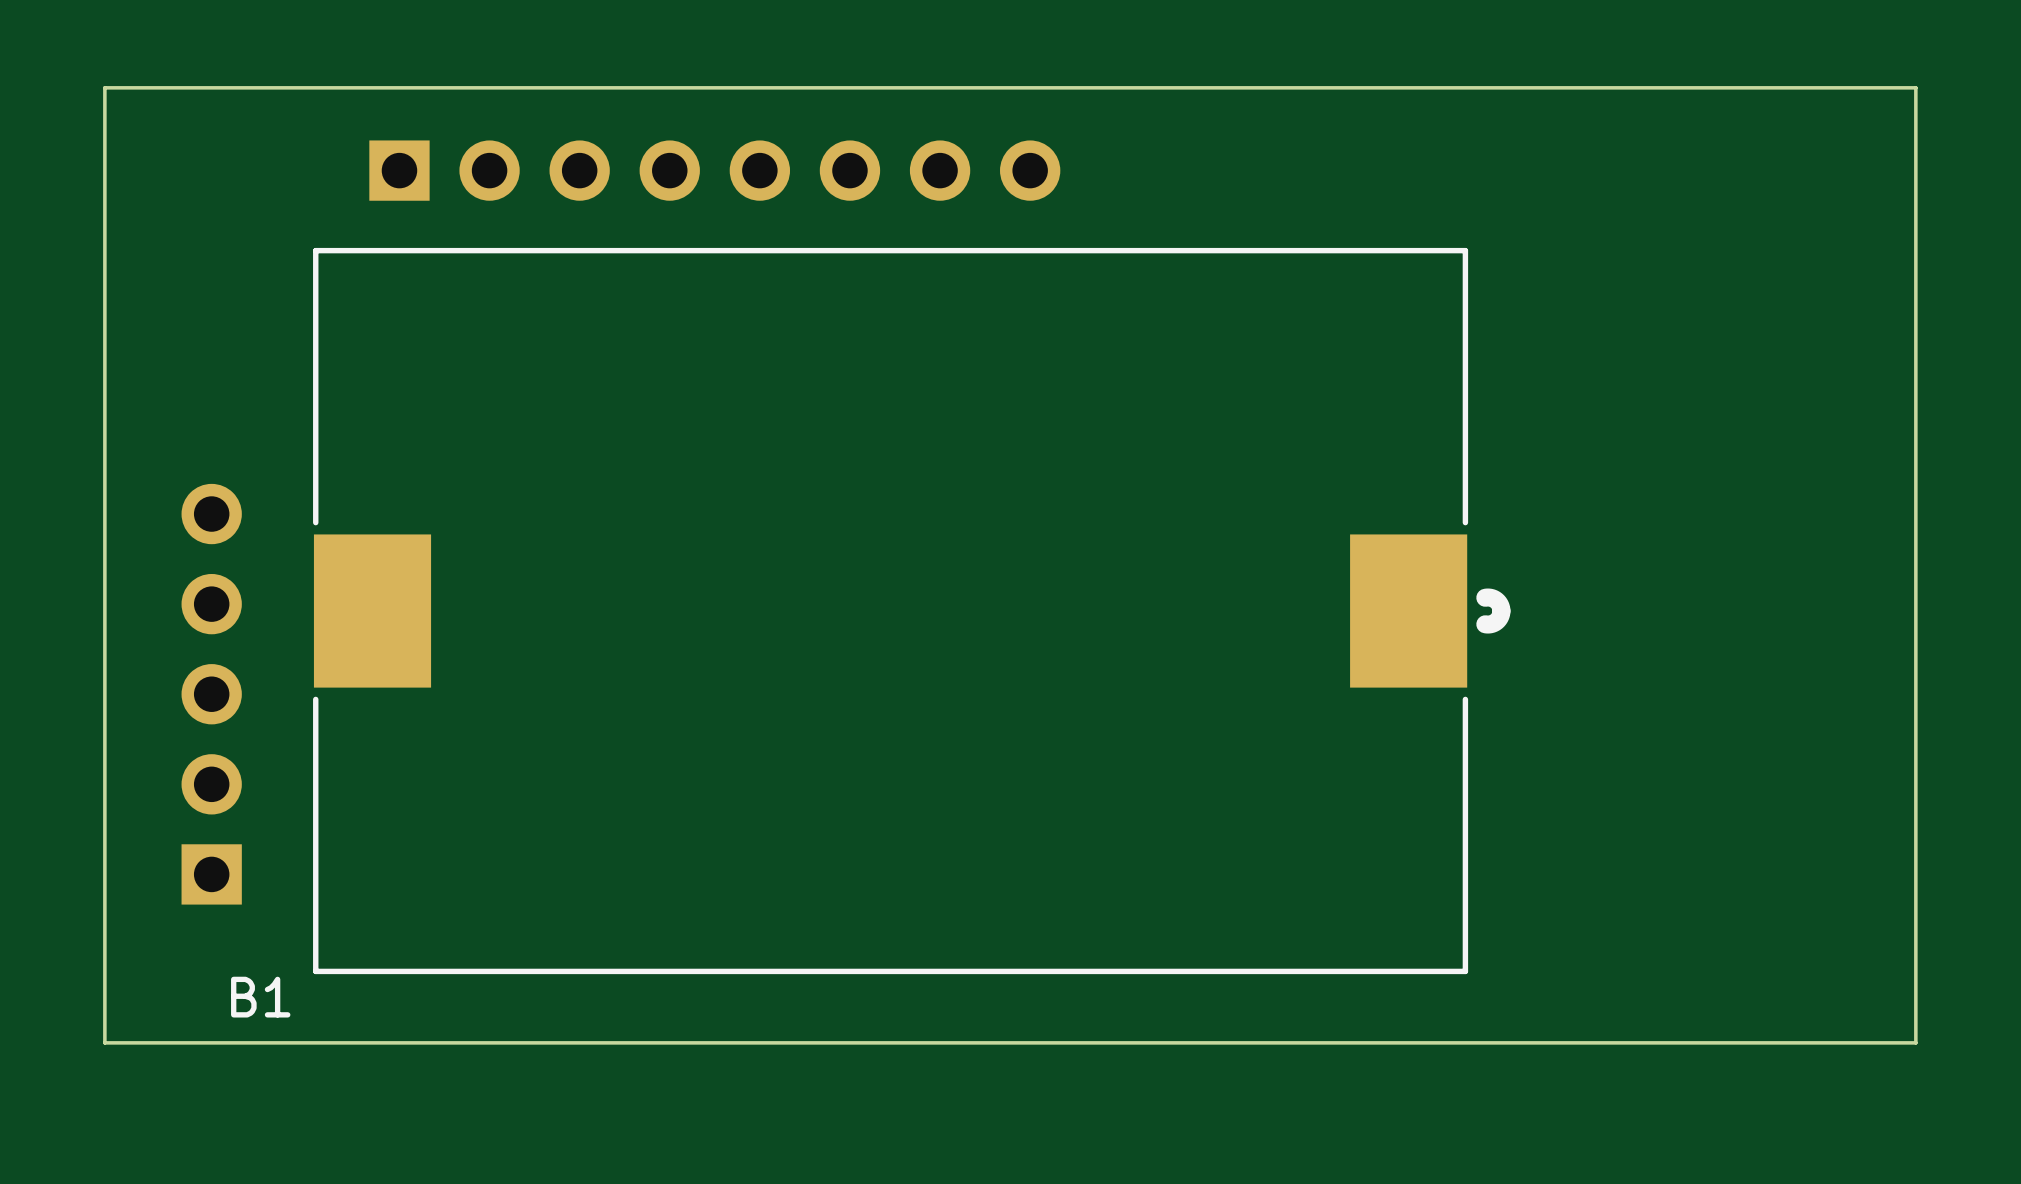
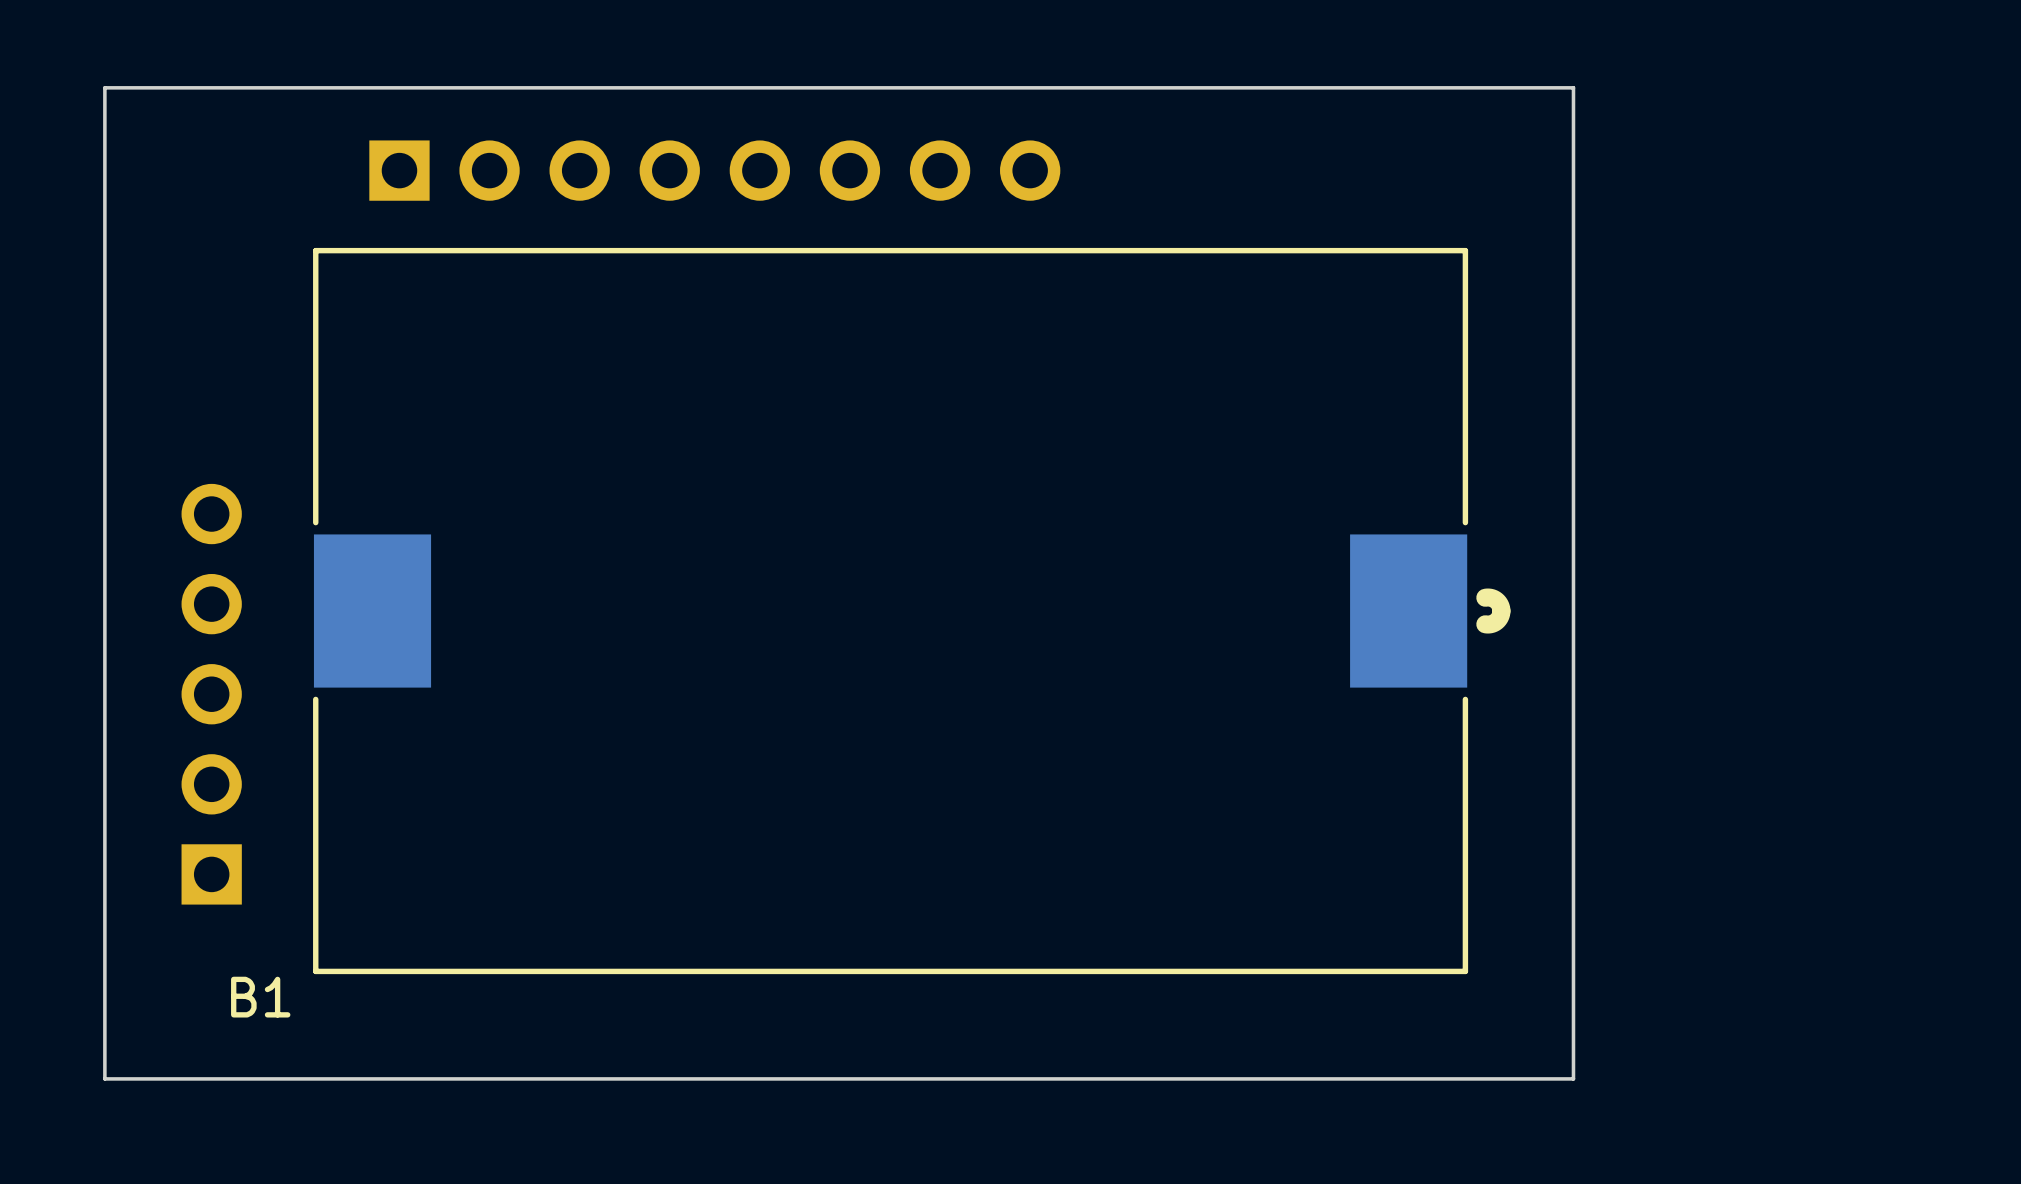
board edge: (1573, 87) (1915, 87) (1915, 1042) (104, 1042) -> (1573, 87) (1573, 1078) (104, 1078) (104, 1042)

